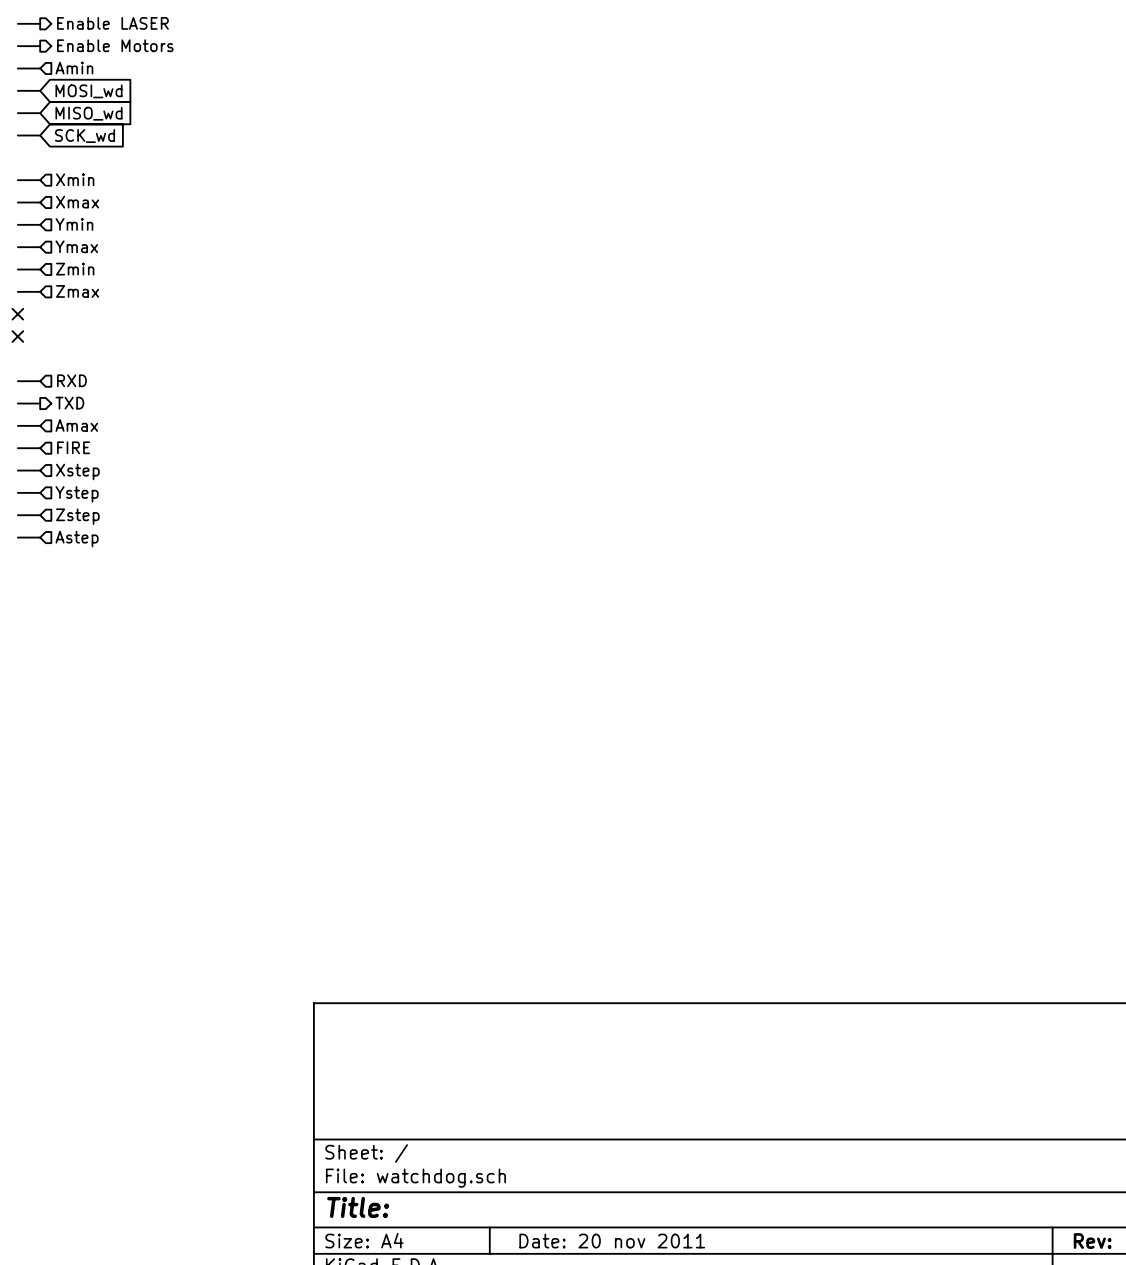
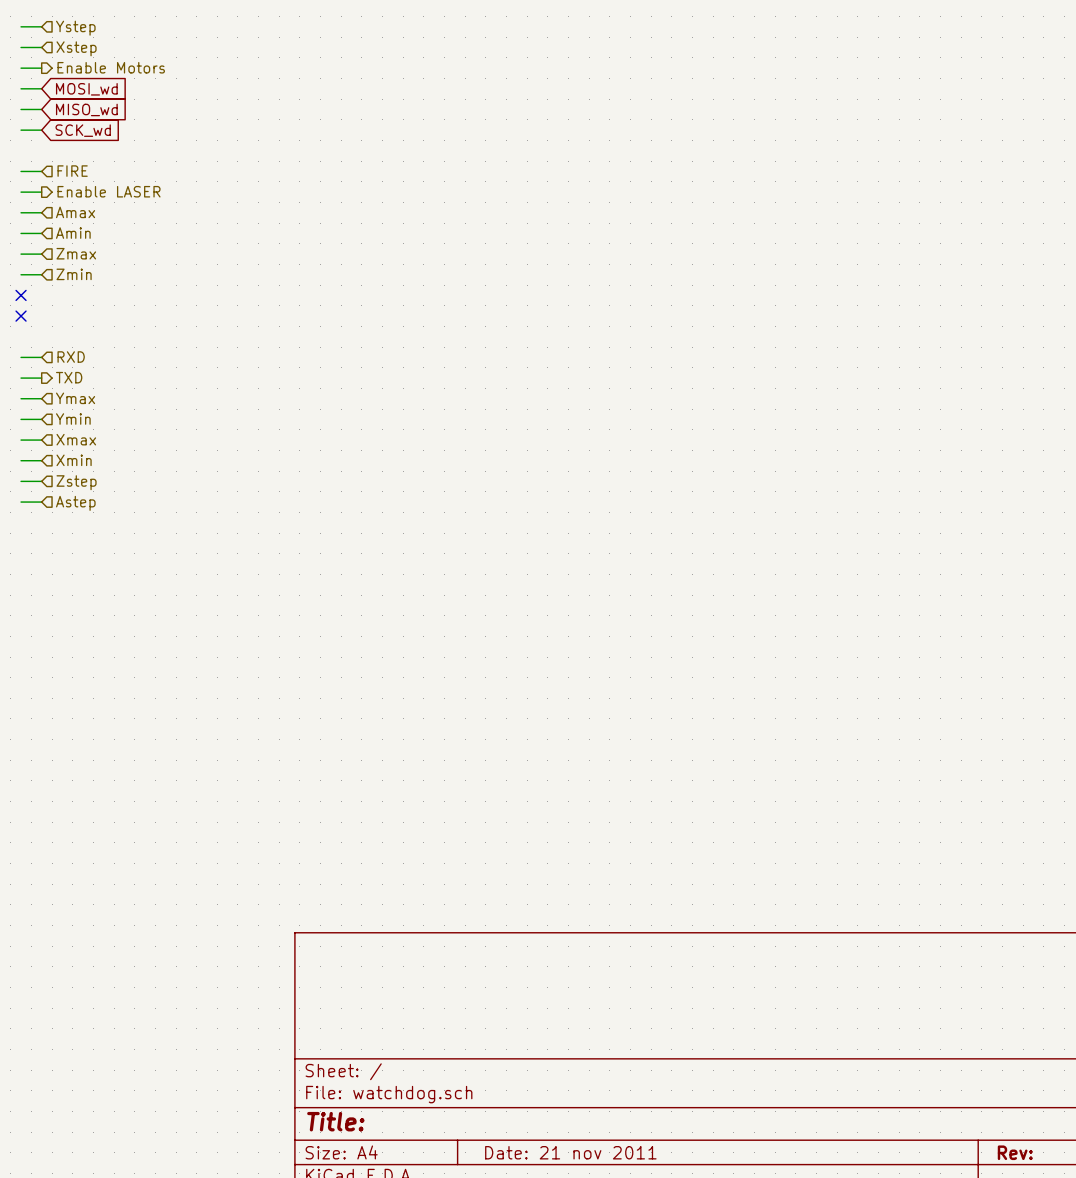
hierarchical label shape: output (112, 23) -> input (75, 28)
hierarchical label: Enable LASER (112, 23) -> Ystep (75, 28)
hierarchical label shape: output (115, 45) -> input (76, 48)
hierarchical label: Enable Motors (115, 45) -> Xstep (76, 48)
hierarchical label shape: input (74, 68) -> output (111, 67)
hierarchical label: Amin (74, 68) -> Enable Motors (111, 67)
hierarchical label: Xmin (75, 179) -> FIRE (72, 171)
hierarchical label shape: input (77, 202) -> output (109, 191)
hierarchical label: Xmax (77, 202) -> Enable LASER (109, 191)
hierarchical label: Ymin (74, 224) -> Amax (75, 212)
hierarchical label: Ymax (76, 246) -> Amin (73, 233)
hierarchical label: Zmin (75, 269) -> Zmax (76, 253)
hierarchical label: Zmax (77, 291) -> Zmin (74, 274)
hierarchical label: Amax (76, 425) -> Ymax (75, 398)
hierarchical label: FIRE (73, 447) -> Ymin (73, 419)
hierarchical label: Xstep (77, 471) -> Xmax (76, 439)
hierarchical label: Ystep (77, 494) -> Xmin (74, 460)
title block: Date: 20 nov 2011 (612, 1241) -> Date: 21 nov 2011 (570, 1152)

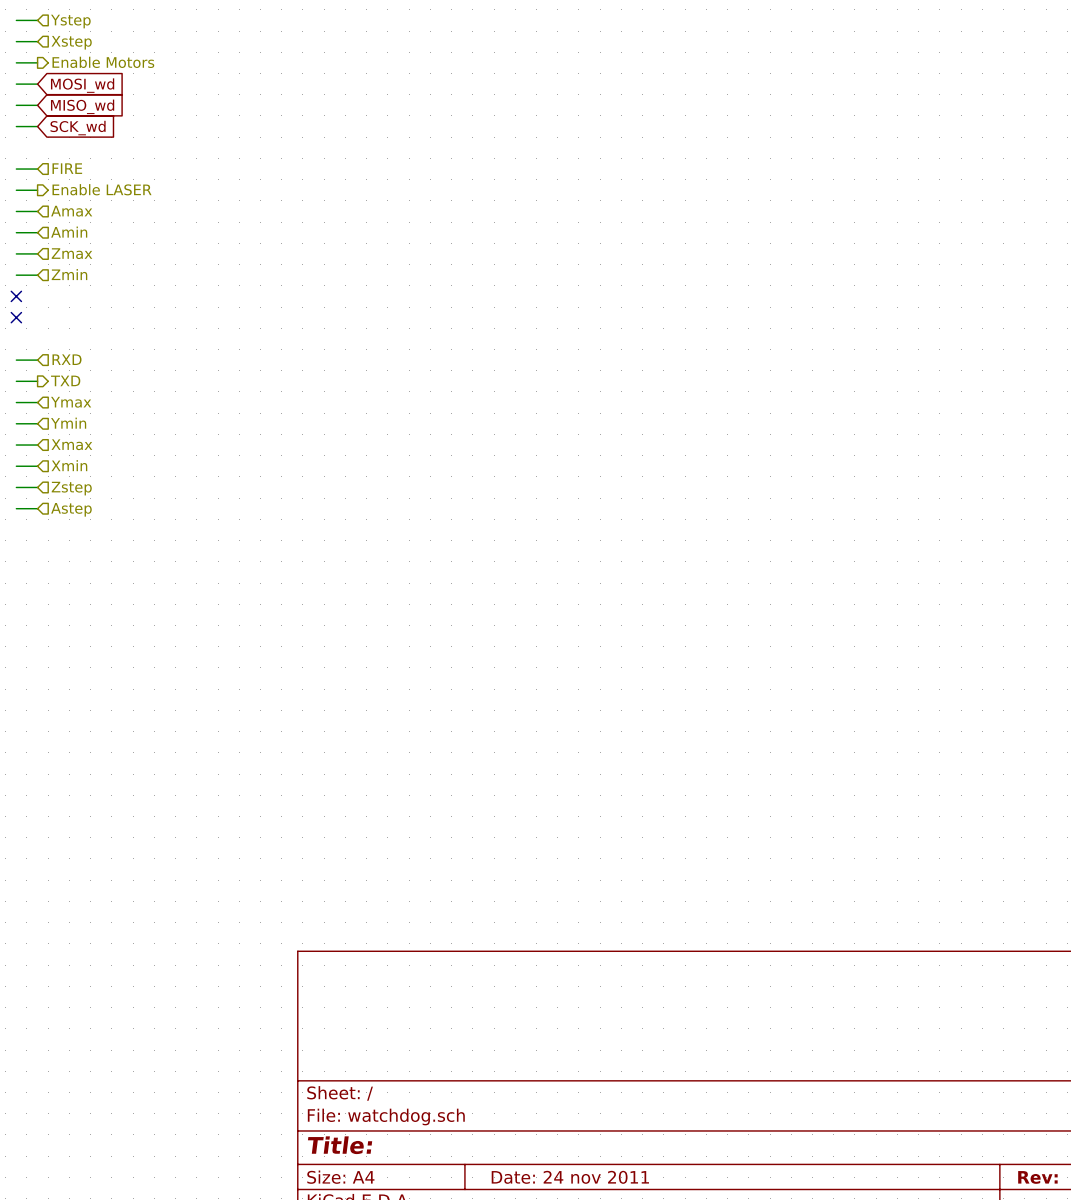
title block: Date: 21 nov 2011 (570, 1152) -> Date: 24 nov 2011 (570, 1177)

